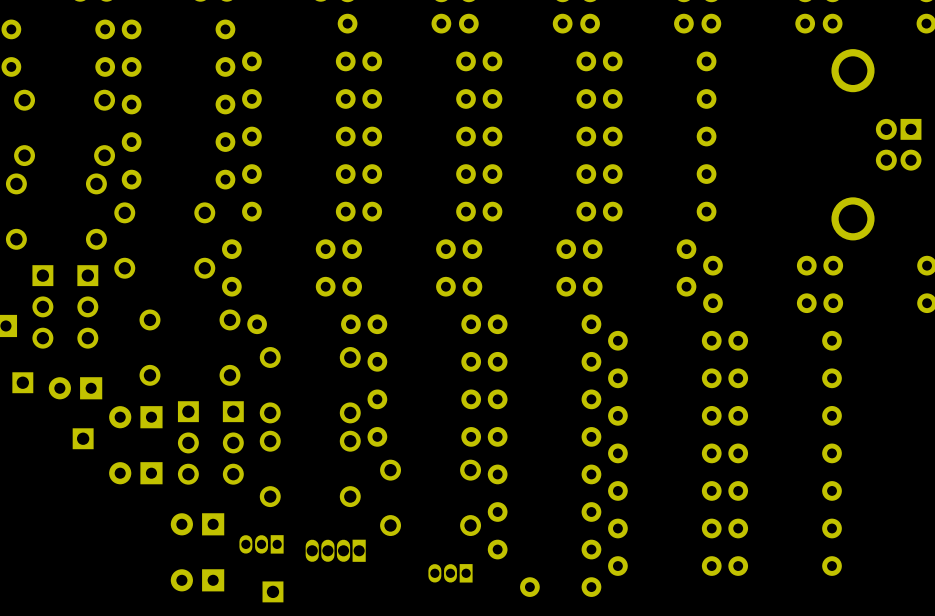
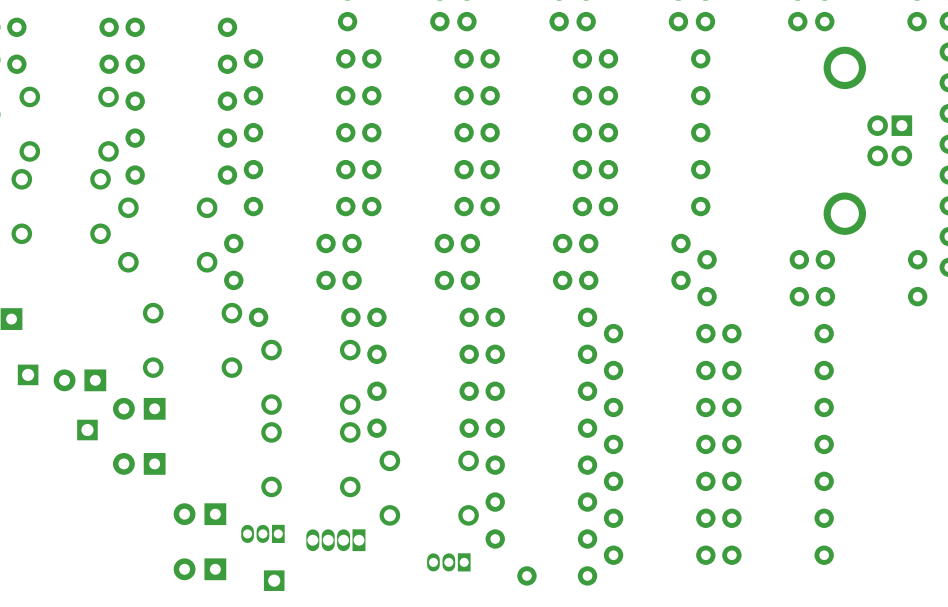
part: (42, 306) -> none
part: (87, 306) -> none
part: (188, 442) -> none
part: (233, 442) -> none

